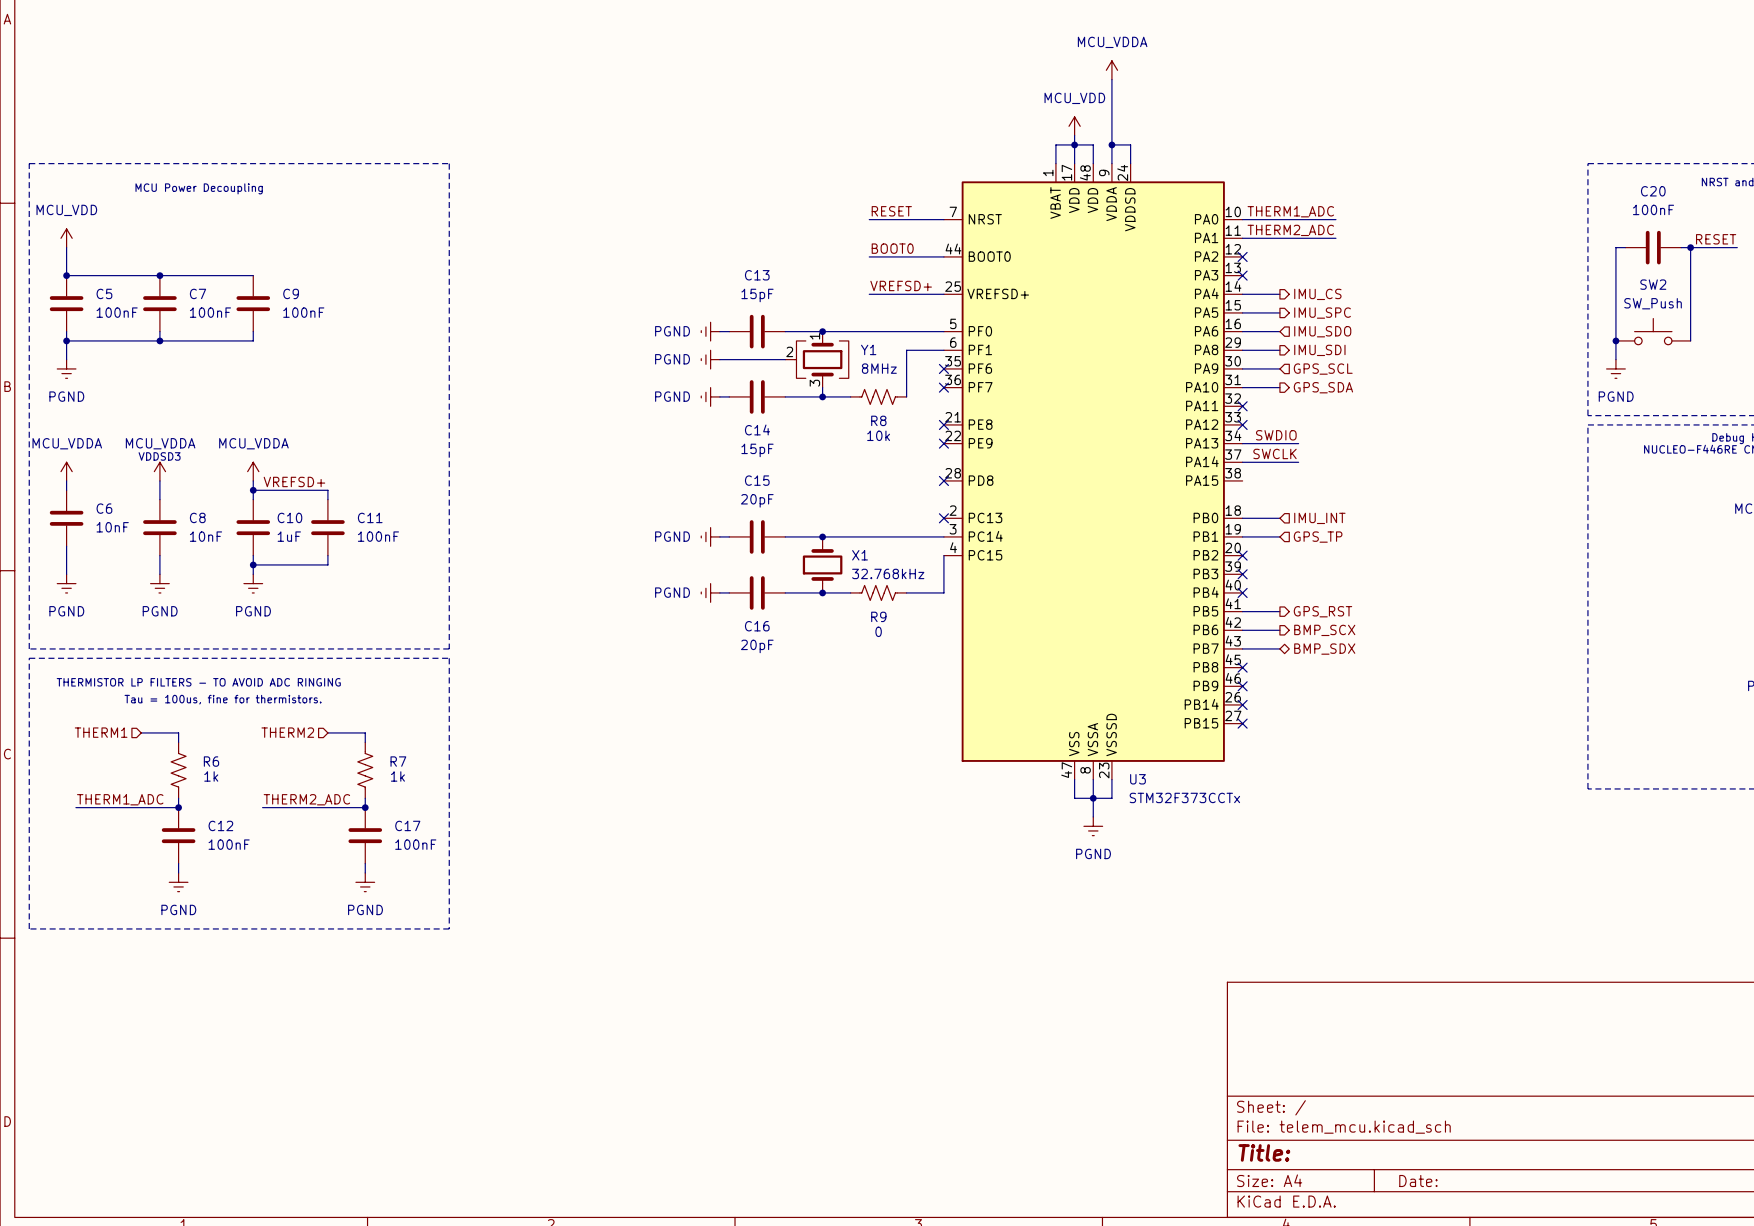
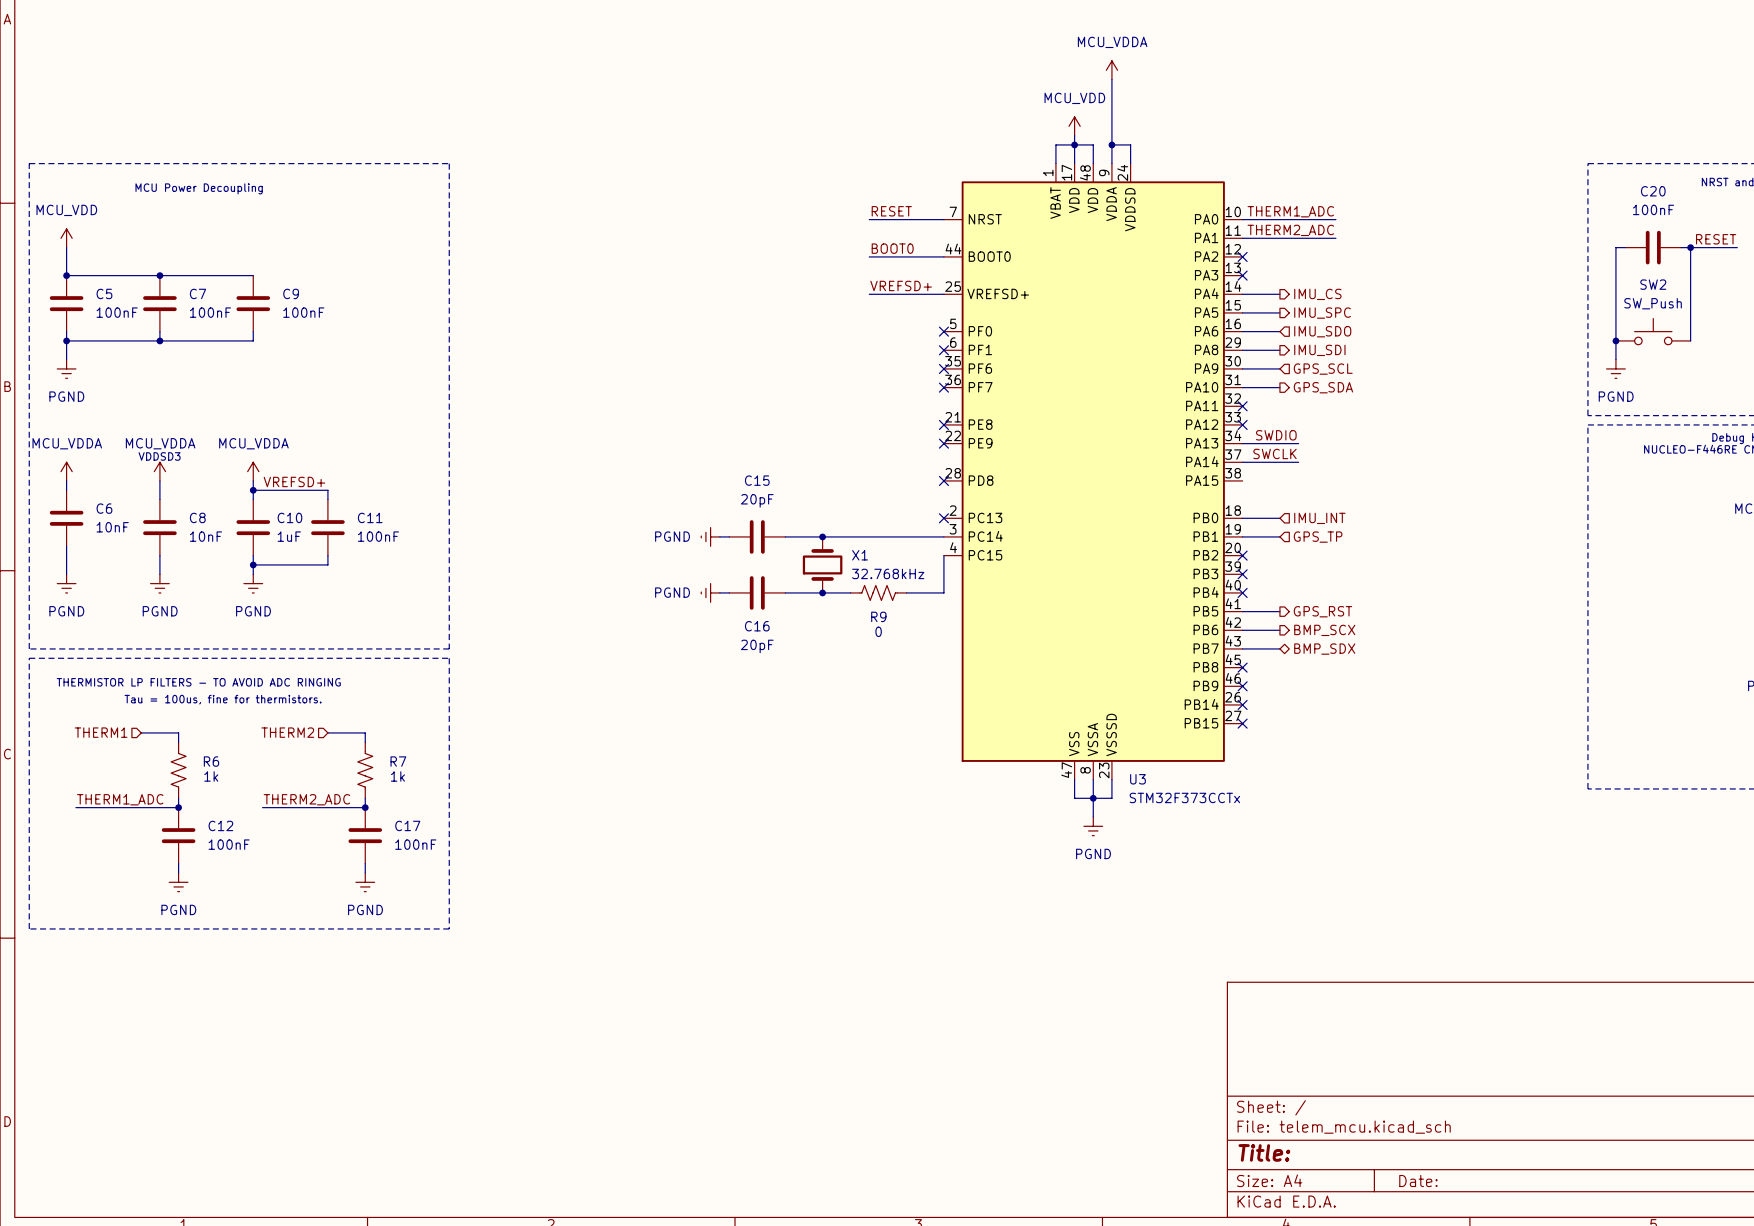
power symbol: PGND (710, 331) -> none
wire: (719, 331) (729, 331) -> none
C13: 15pF (757, 331) -> none
wire: (785, 331) (943, 331) -> none
junction: (822, 331) -> none
no-connect mark: none -> (943, 331)
wire: (943, 350) (906, 350) (906, 396) -> none
no-connect mark: none -> (943, 350)
power symbol: PGND (710, 359) -> none
wire: (719, 359) (785, 359) -> none
Y1: 8MHz (817, 359) -> none
wire: (822, 387) (822, 396) -> none
power symbol: PGND (710, 396) -> none
wire: (719, 396) (729, 396) -> none
C14: 15pF (757, 396) -> none
wire: (785, 396) (850, 396) -> none
junction: (822, 396) -> none
R8: 10k (878, 396) -> none

